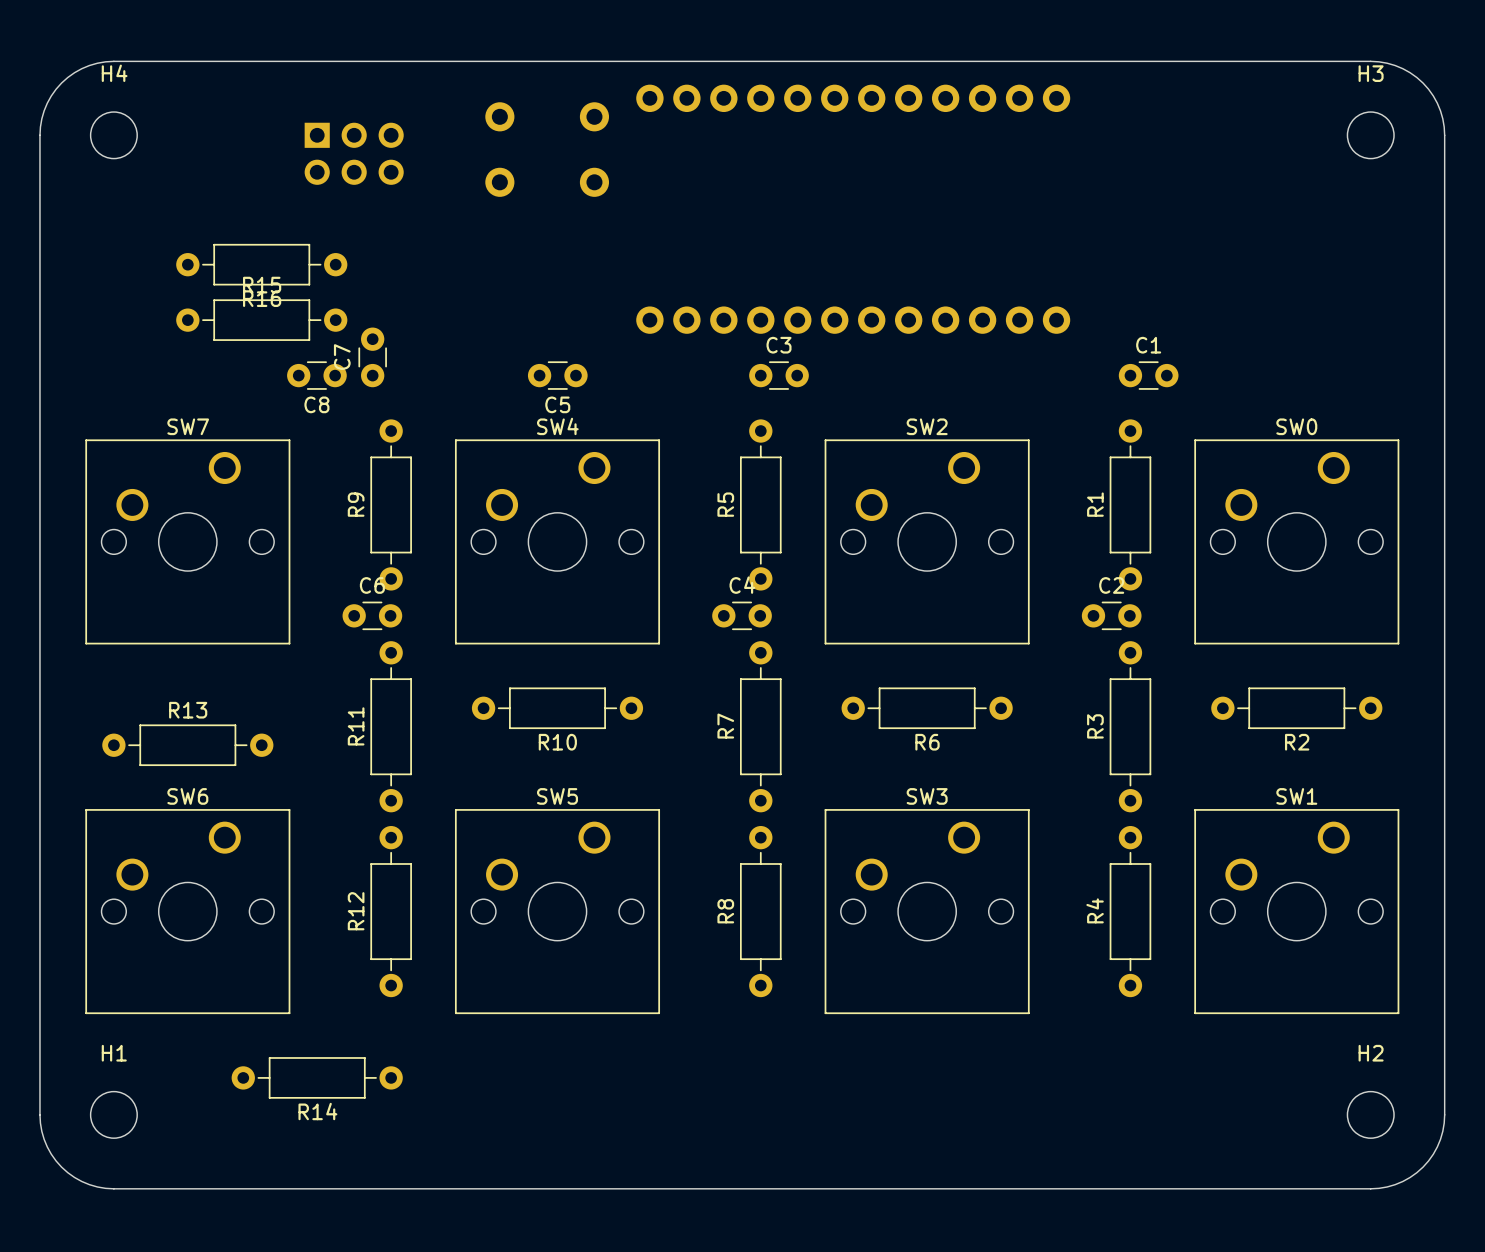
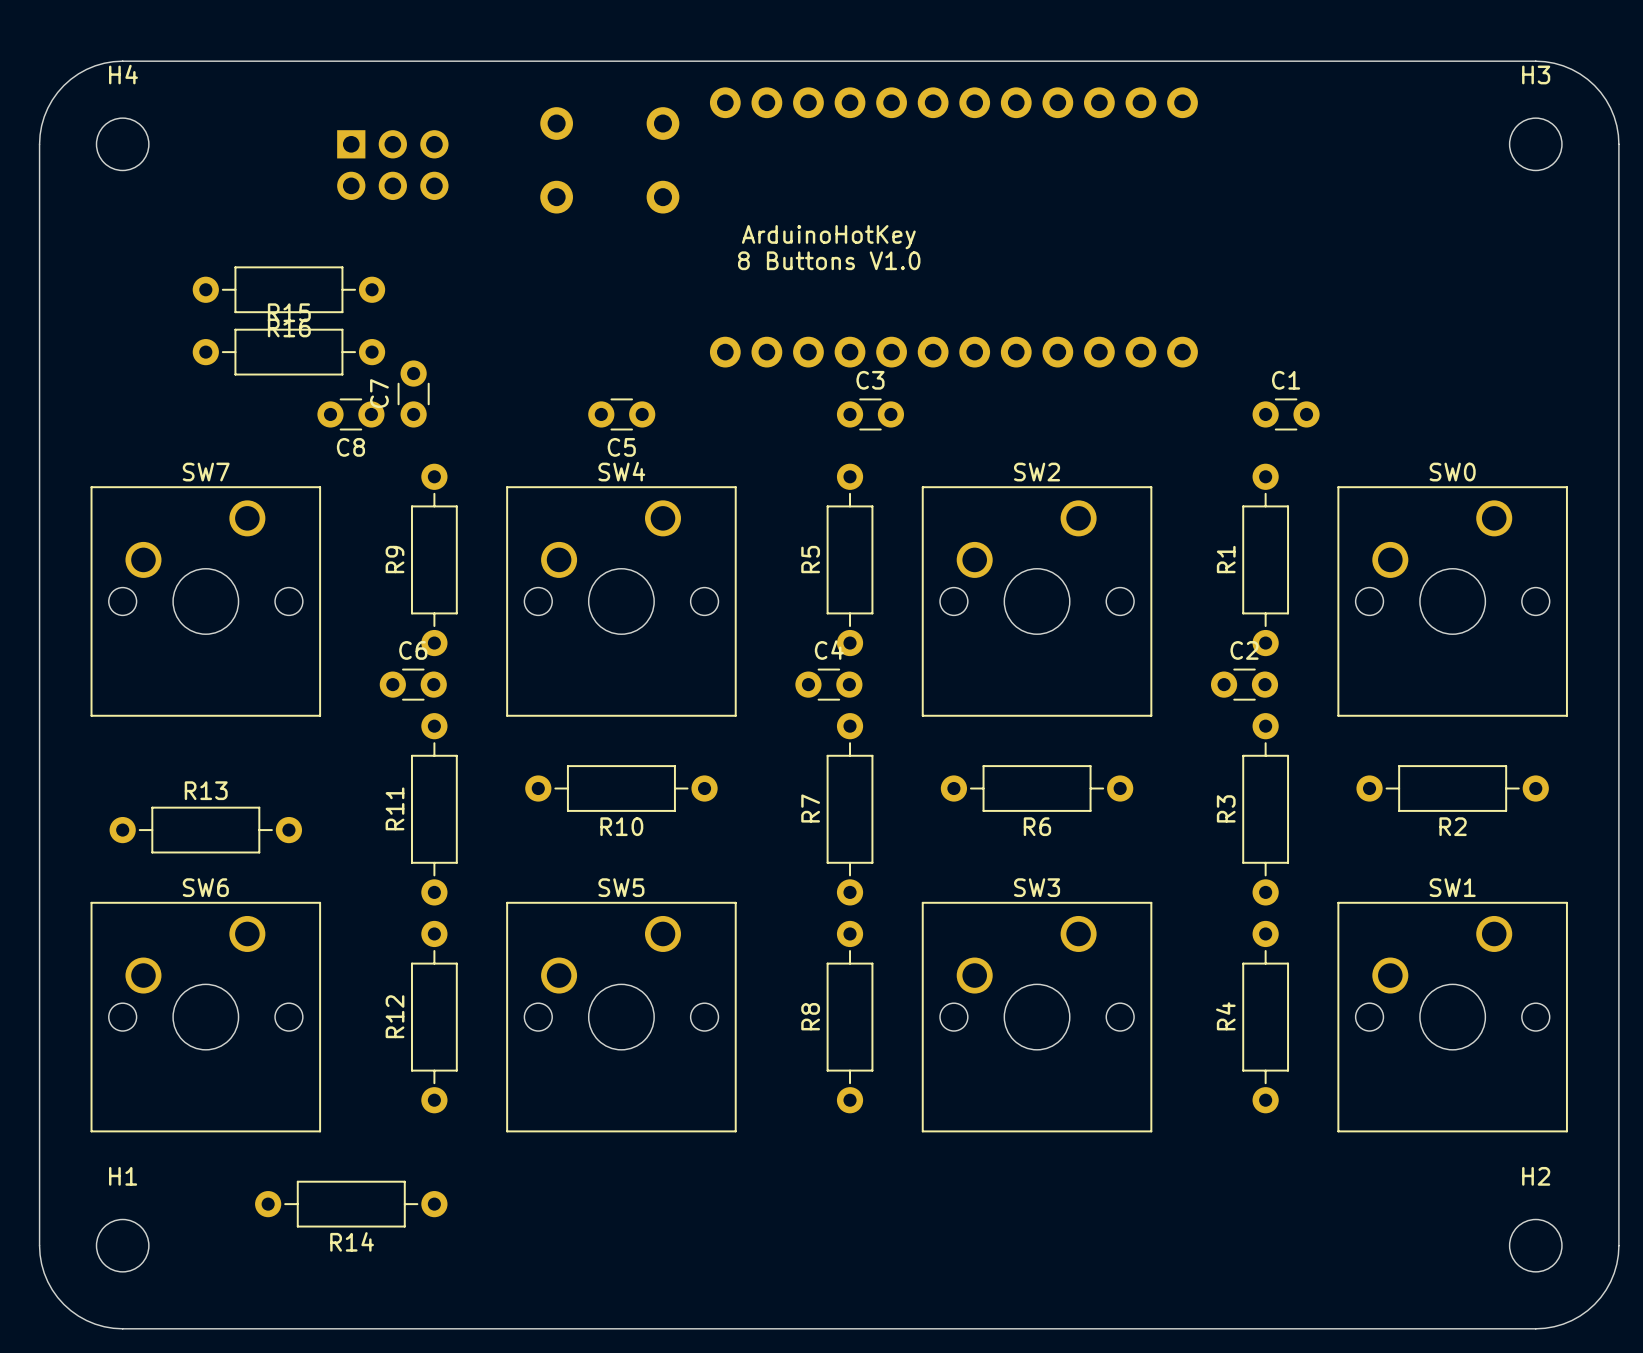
text: none -> ArduinoHotKey (828, 237)
text: none -> 8 Buttons V1.0 (829, 260)

